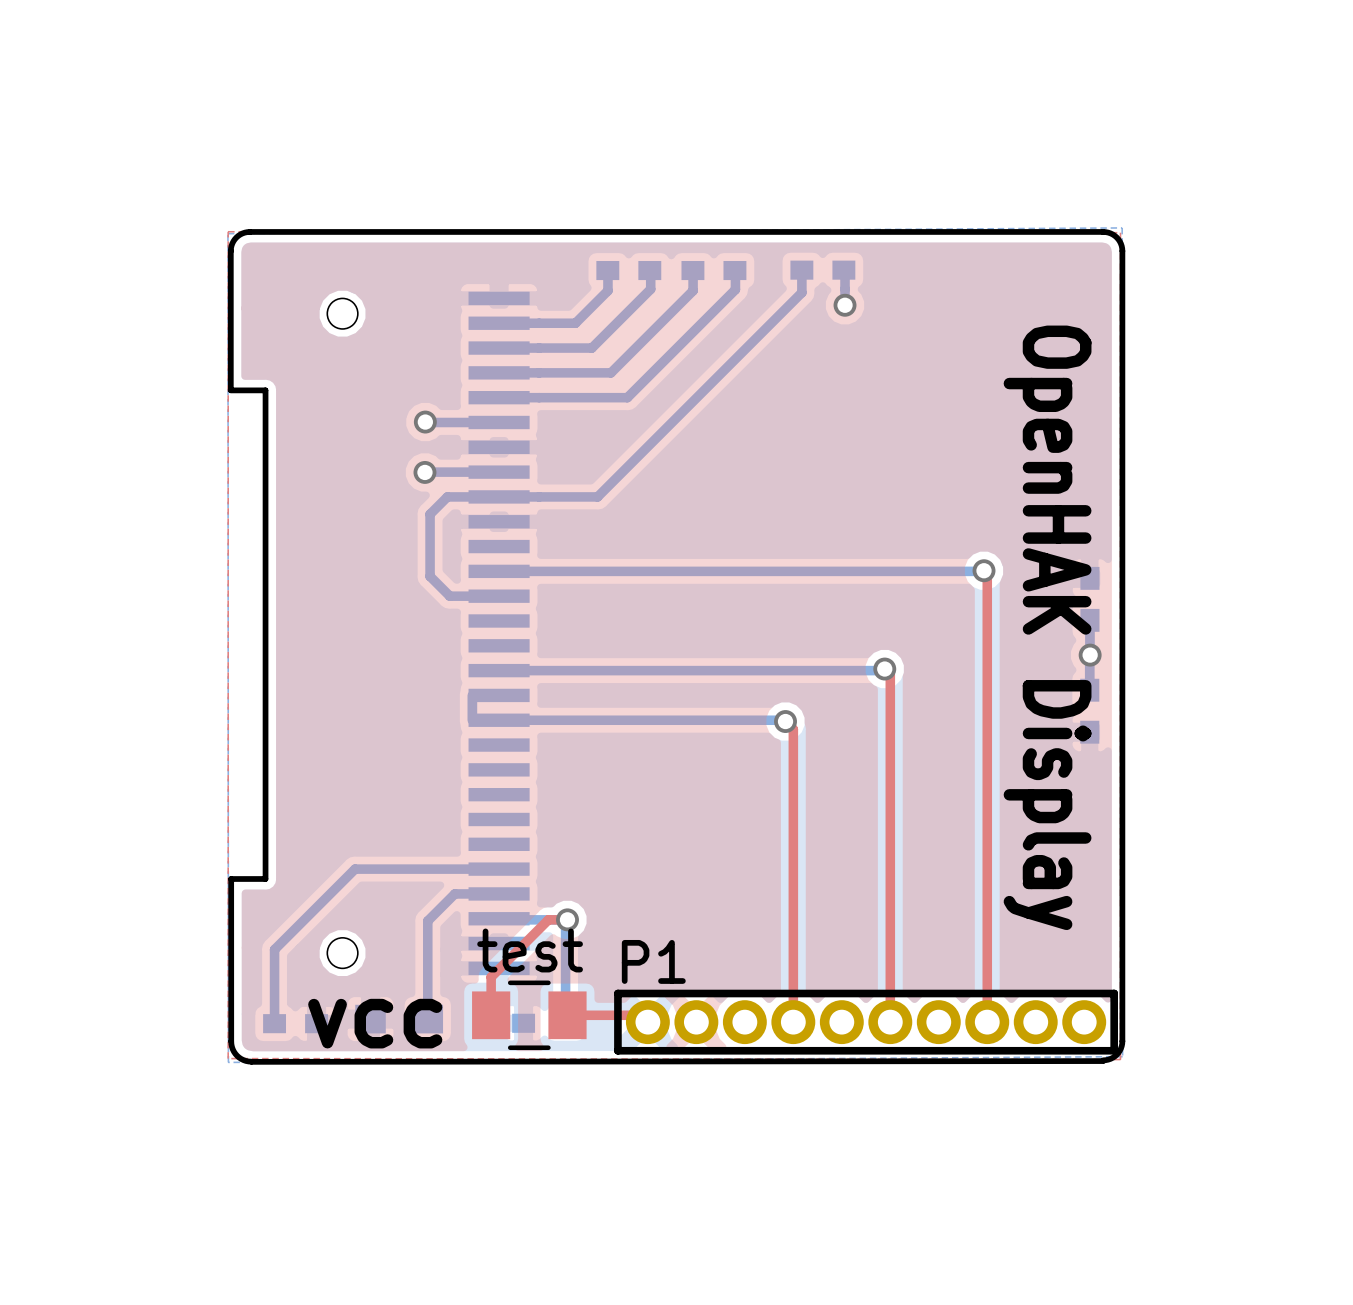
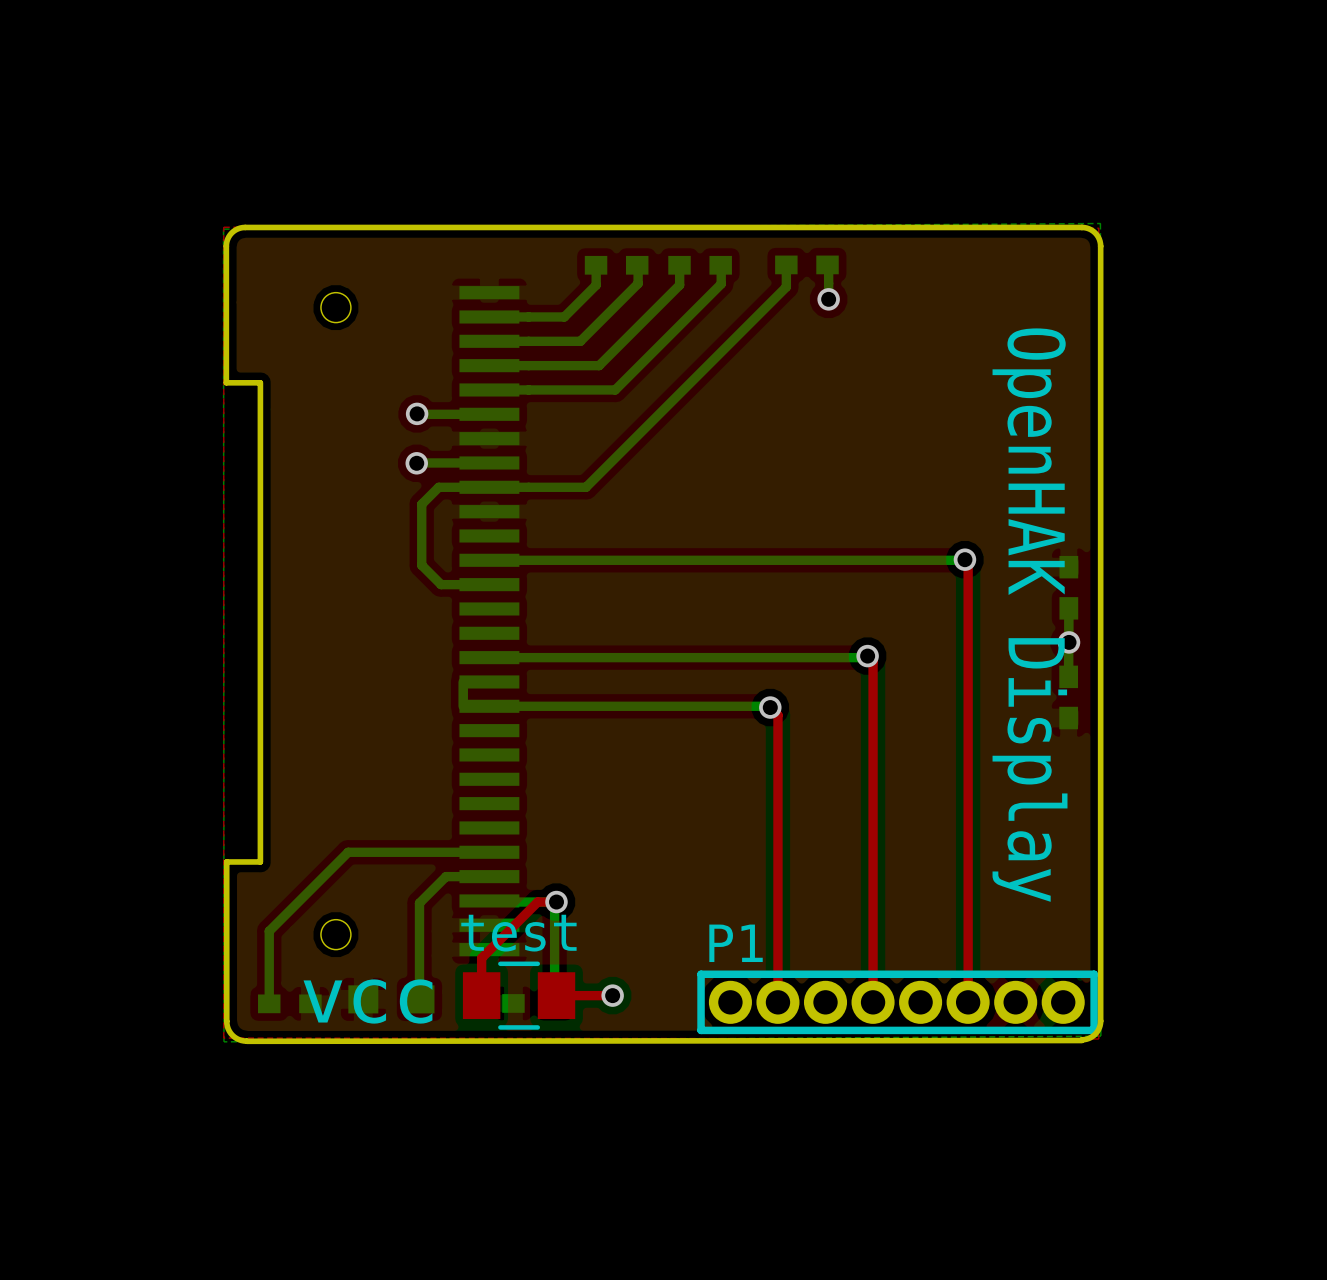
P1 footprint: [614, 989, 1119, 1055] -> [697, 970, 1098, 1035]
via: none -> (612, 995)

